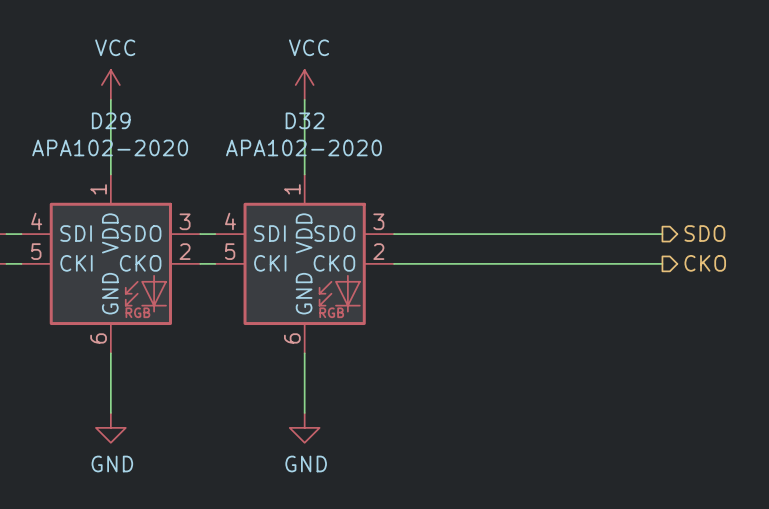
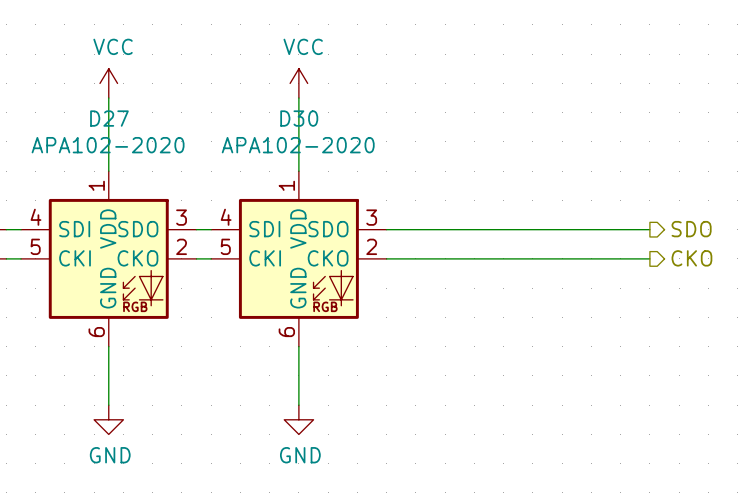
D29 name: D29 (111, 120) -> D27 (109, 118)
D32 name: D32 (305, 120) -> D30 (299, 118)

